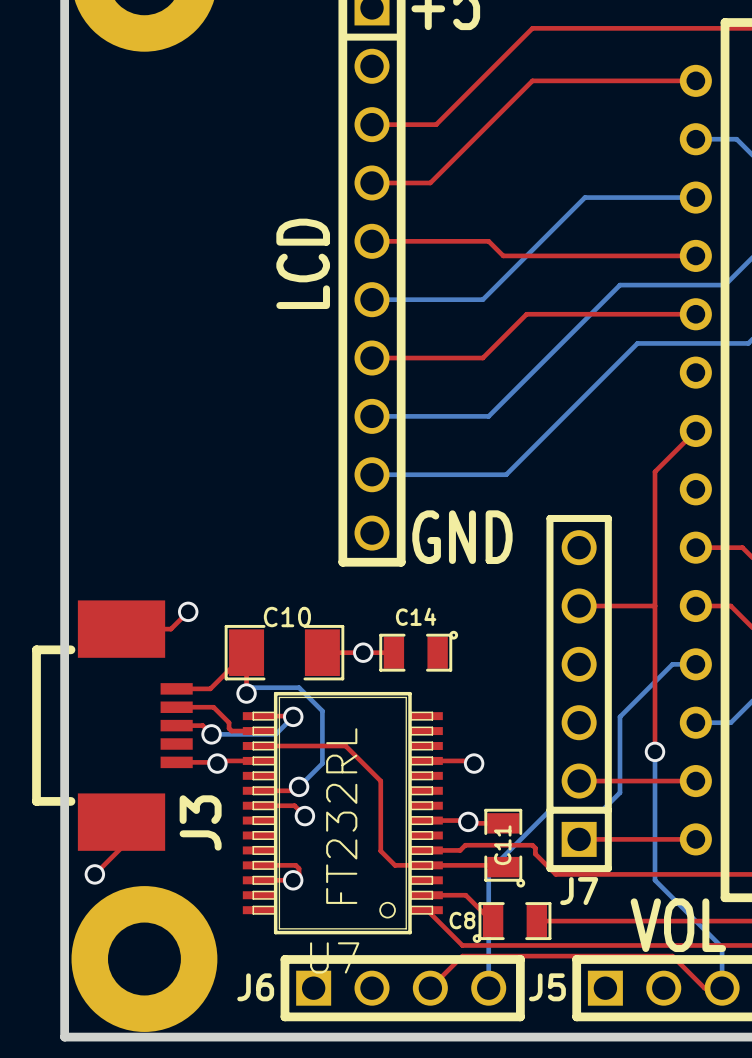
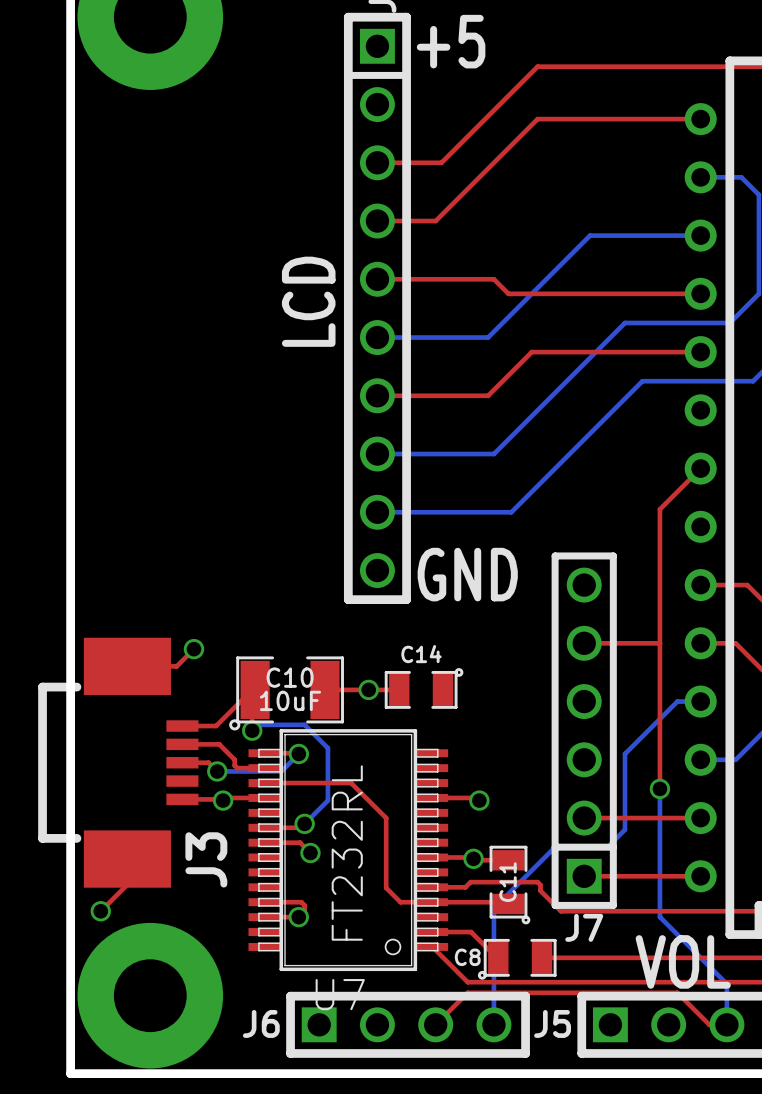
C10 name position: C10 (287, 617) -> C10 (290, 677)
C10 footprint: [224, 624, 345, 681] -> [229, 656, 344, 731]
C10 value: none -> 10uF (290, 700)

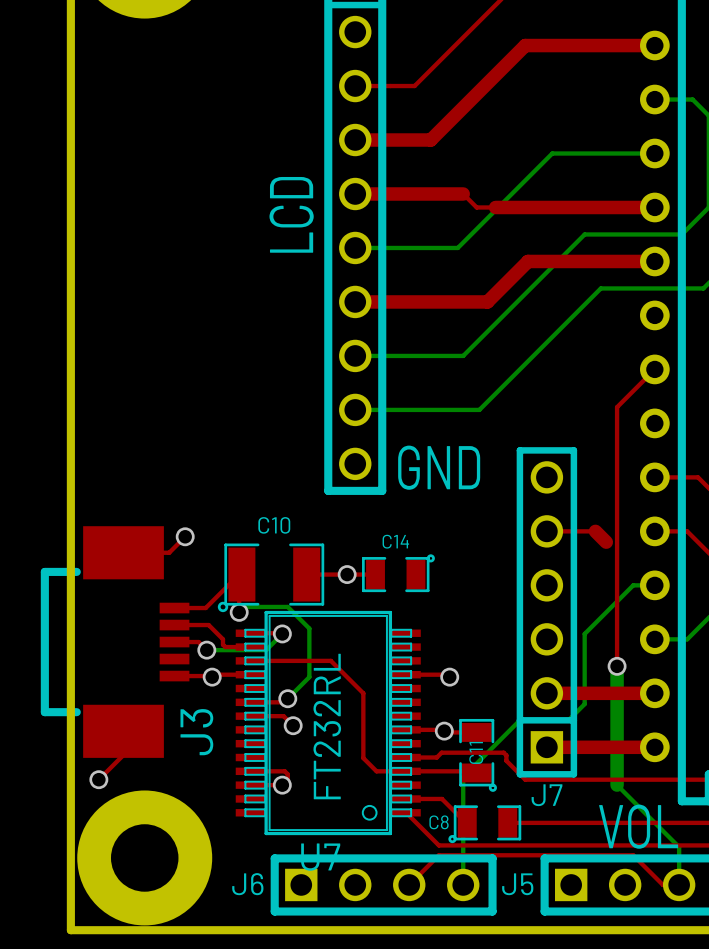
top track: (560, 119) (537, 119) (435, 221) -> (525, 45) (430, 140) (409, 140)
top track width: thin (560, 119) (700, 119) -> thick (525, 45) (654, 45)
top track width: thin (377, 221) (435, 221) -> thick (355, 140) (409, 140)
top track width: thin (377, 279) (493, 279) -> thick (355, 193) (463, 193)
top track width: thin (528, 293) (700, 293) -> thick (495, 207) (654, 207)
top track: (563, 352) (531, 352) (488, 395) -> (528, 261) (487, 301) (457, 301)
top track width: thin (563, 352) (700, 352) -> thick (528, 261) (654, 261)
top track width: thin (377, 395) (488, 395) -> thick (355, 301) (457, 301)
top track: (636, 643) (659, 643) -> (595, 531) (606, 542)
C10 name position: C10 (290, 677) -> C10 (274, 525)
C10 value: 10uF (290, 700) -> none
bottom track width: thin (659, 788) (659, 917) -> thick (617, 666) (617, 785)
top track width: thin (584, 818) (700, 818) -> thick (546, 693) (654, 693)
top track width: thin (584, 876) (700, 876) -> thick (546, 747) (654, 747)

